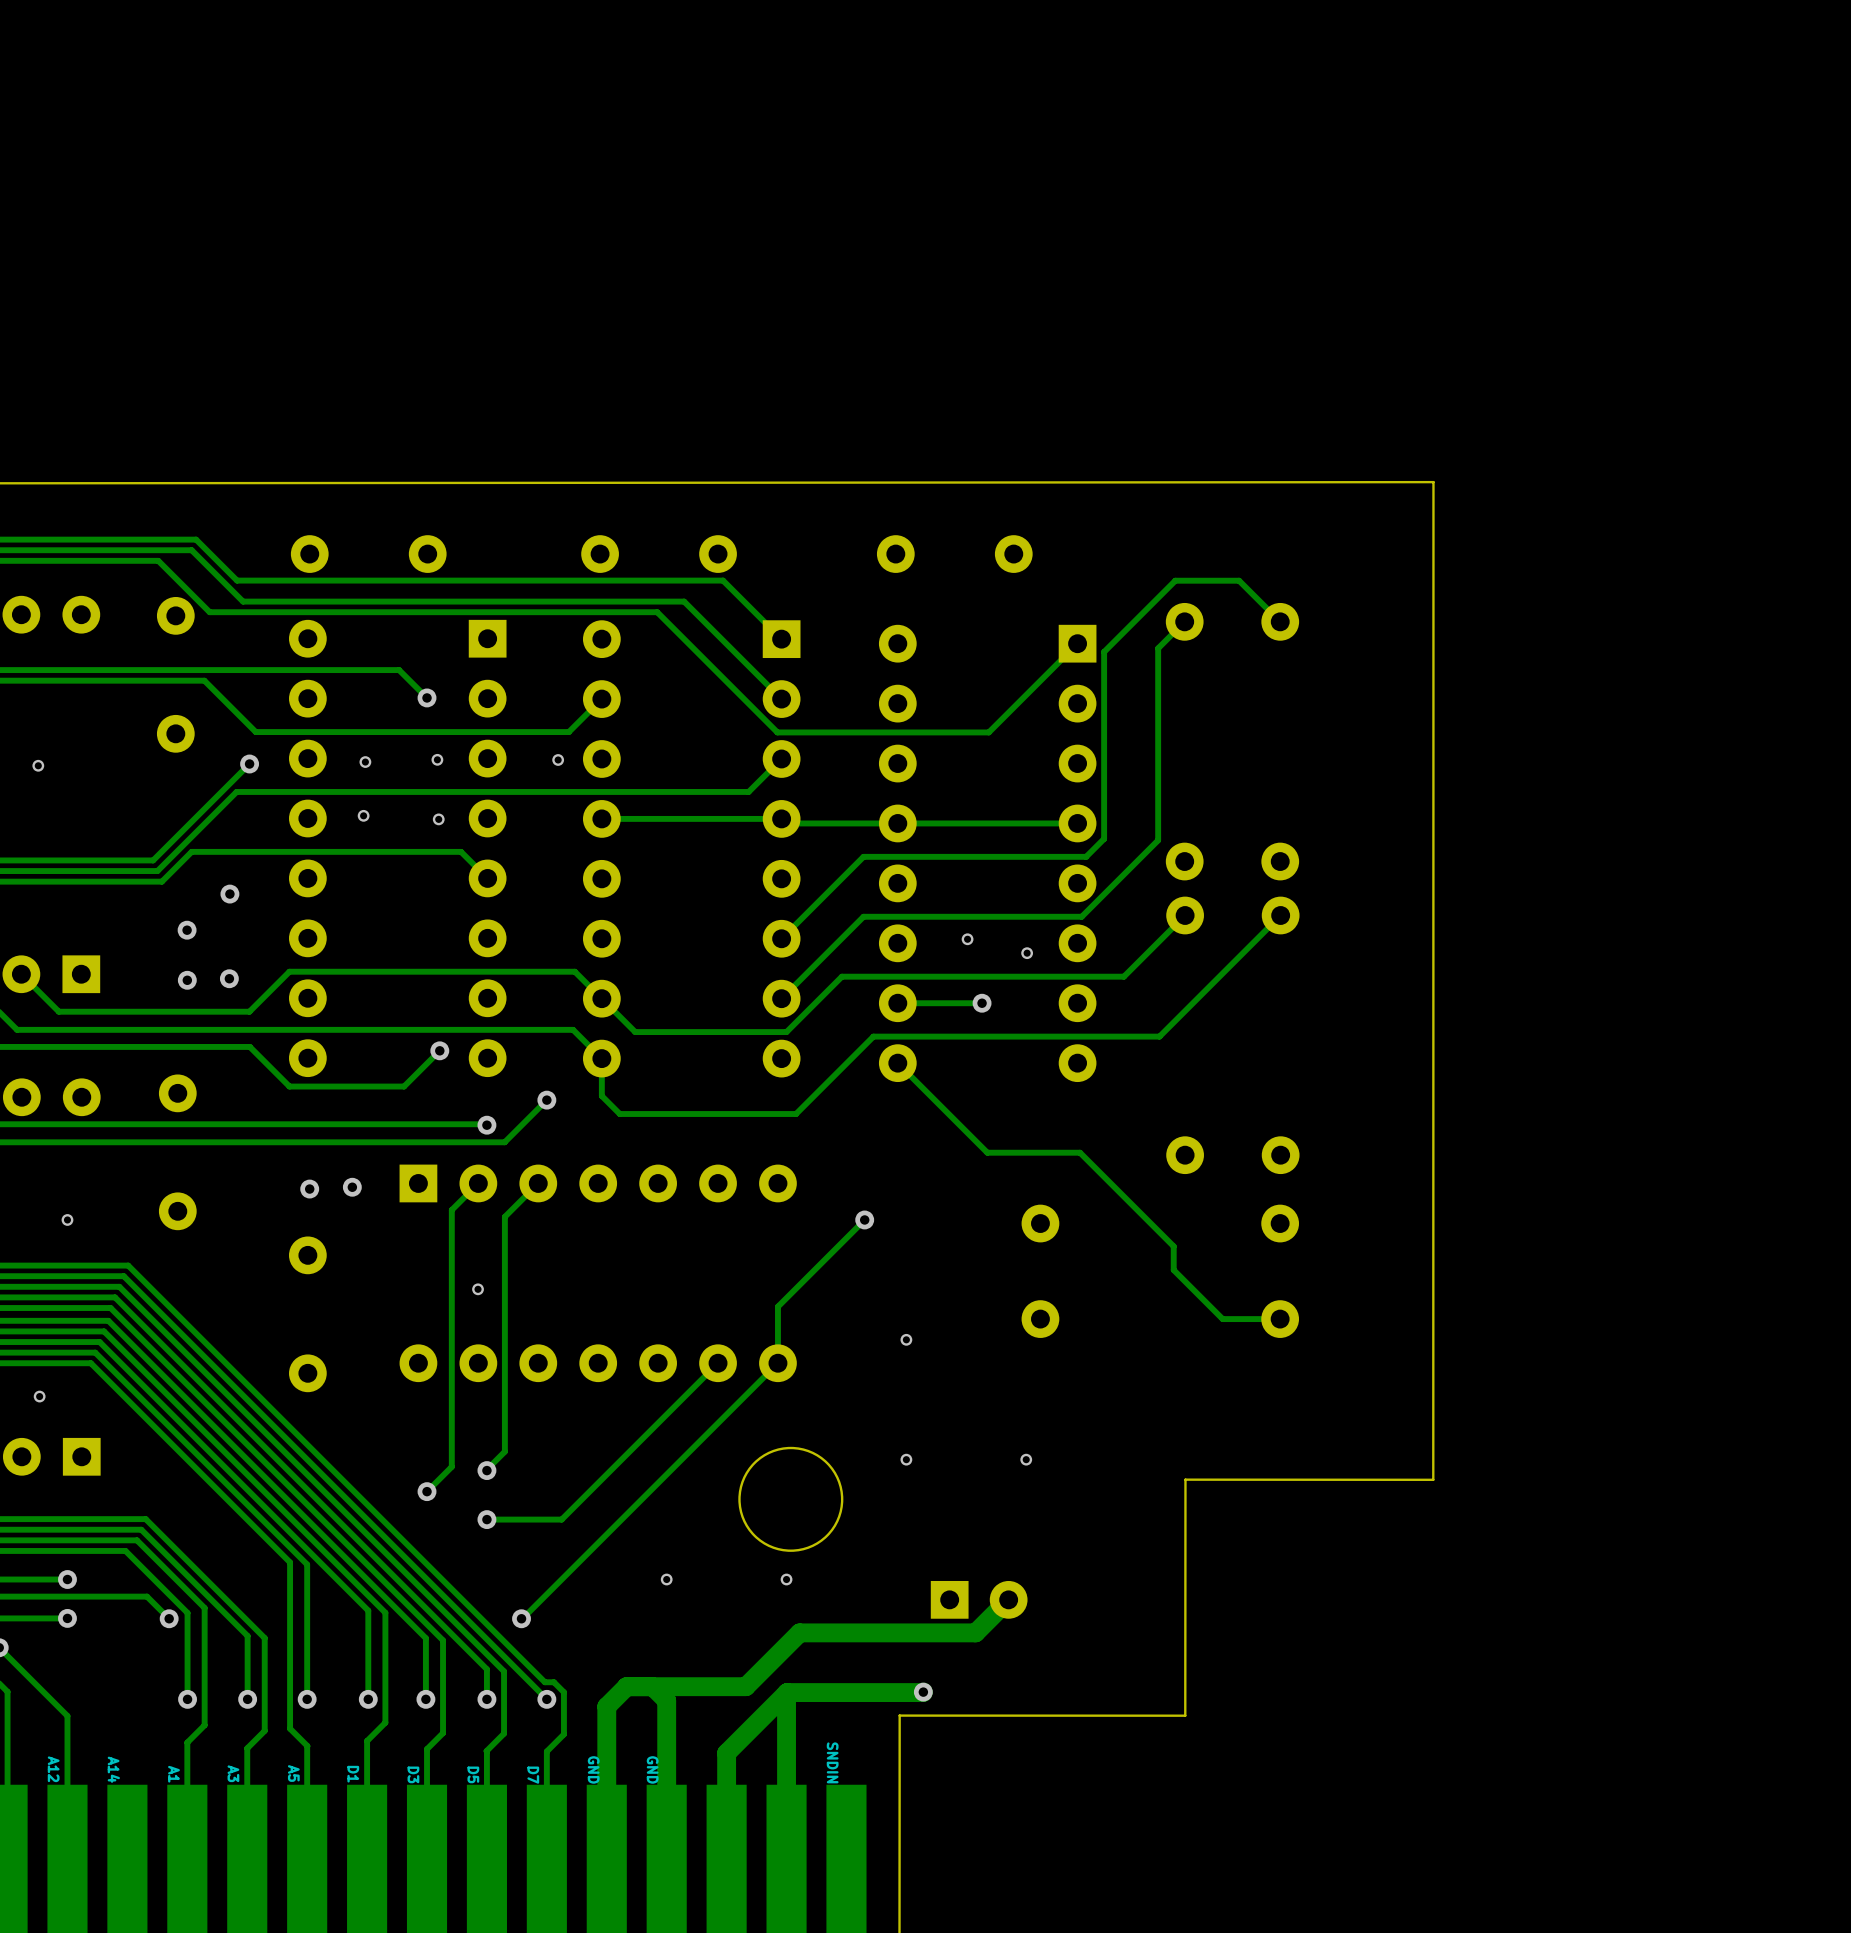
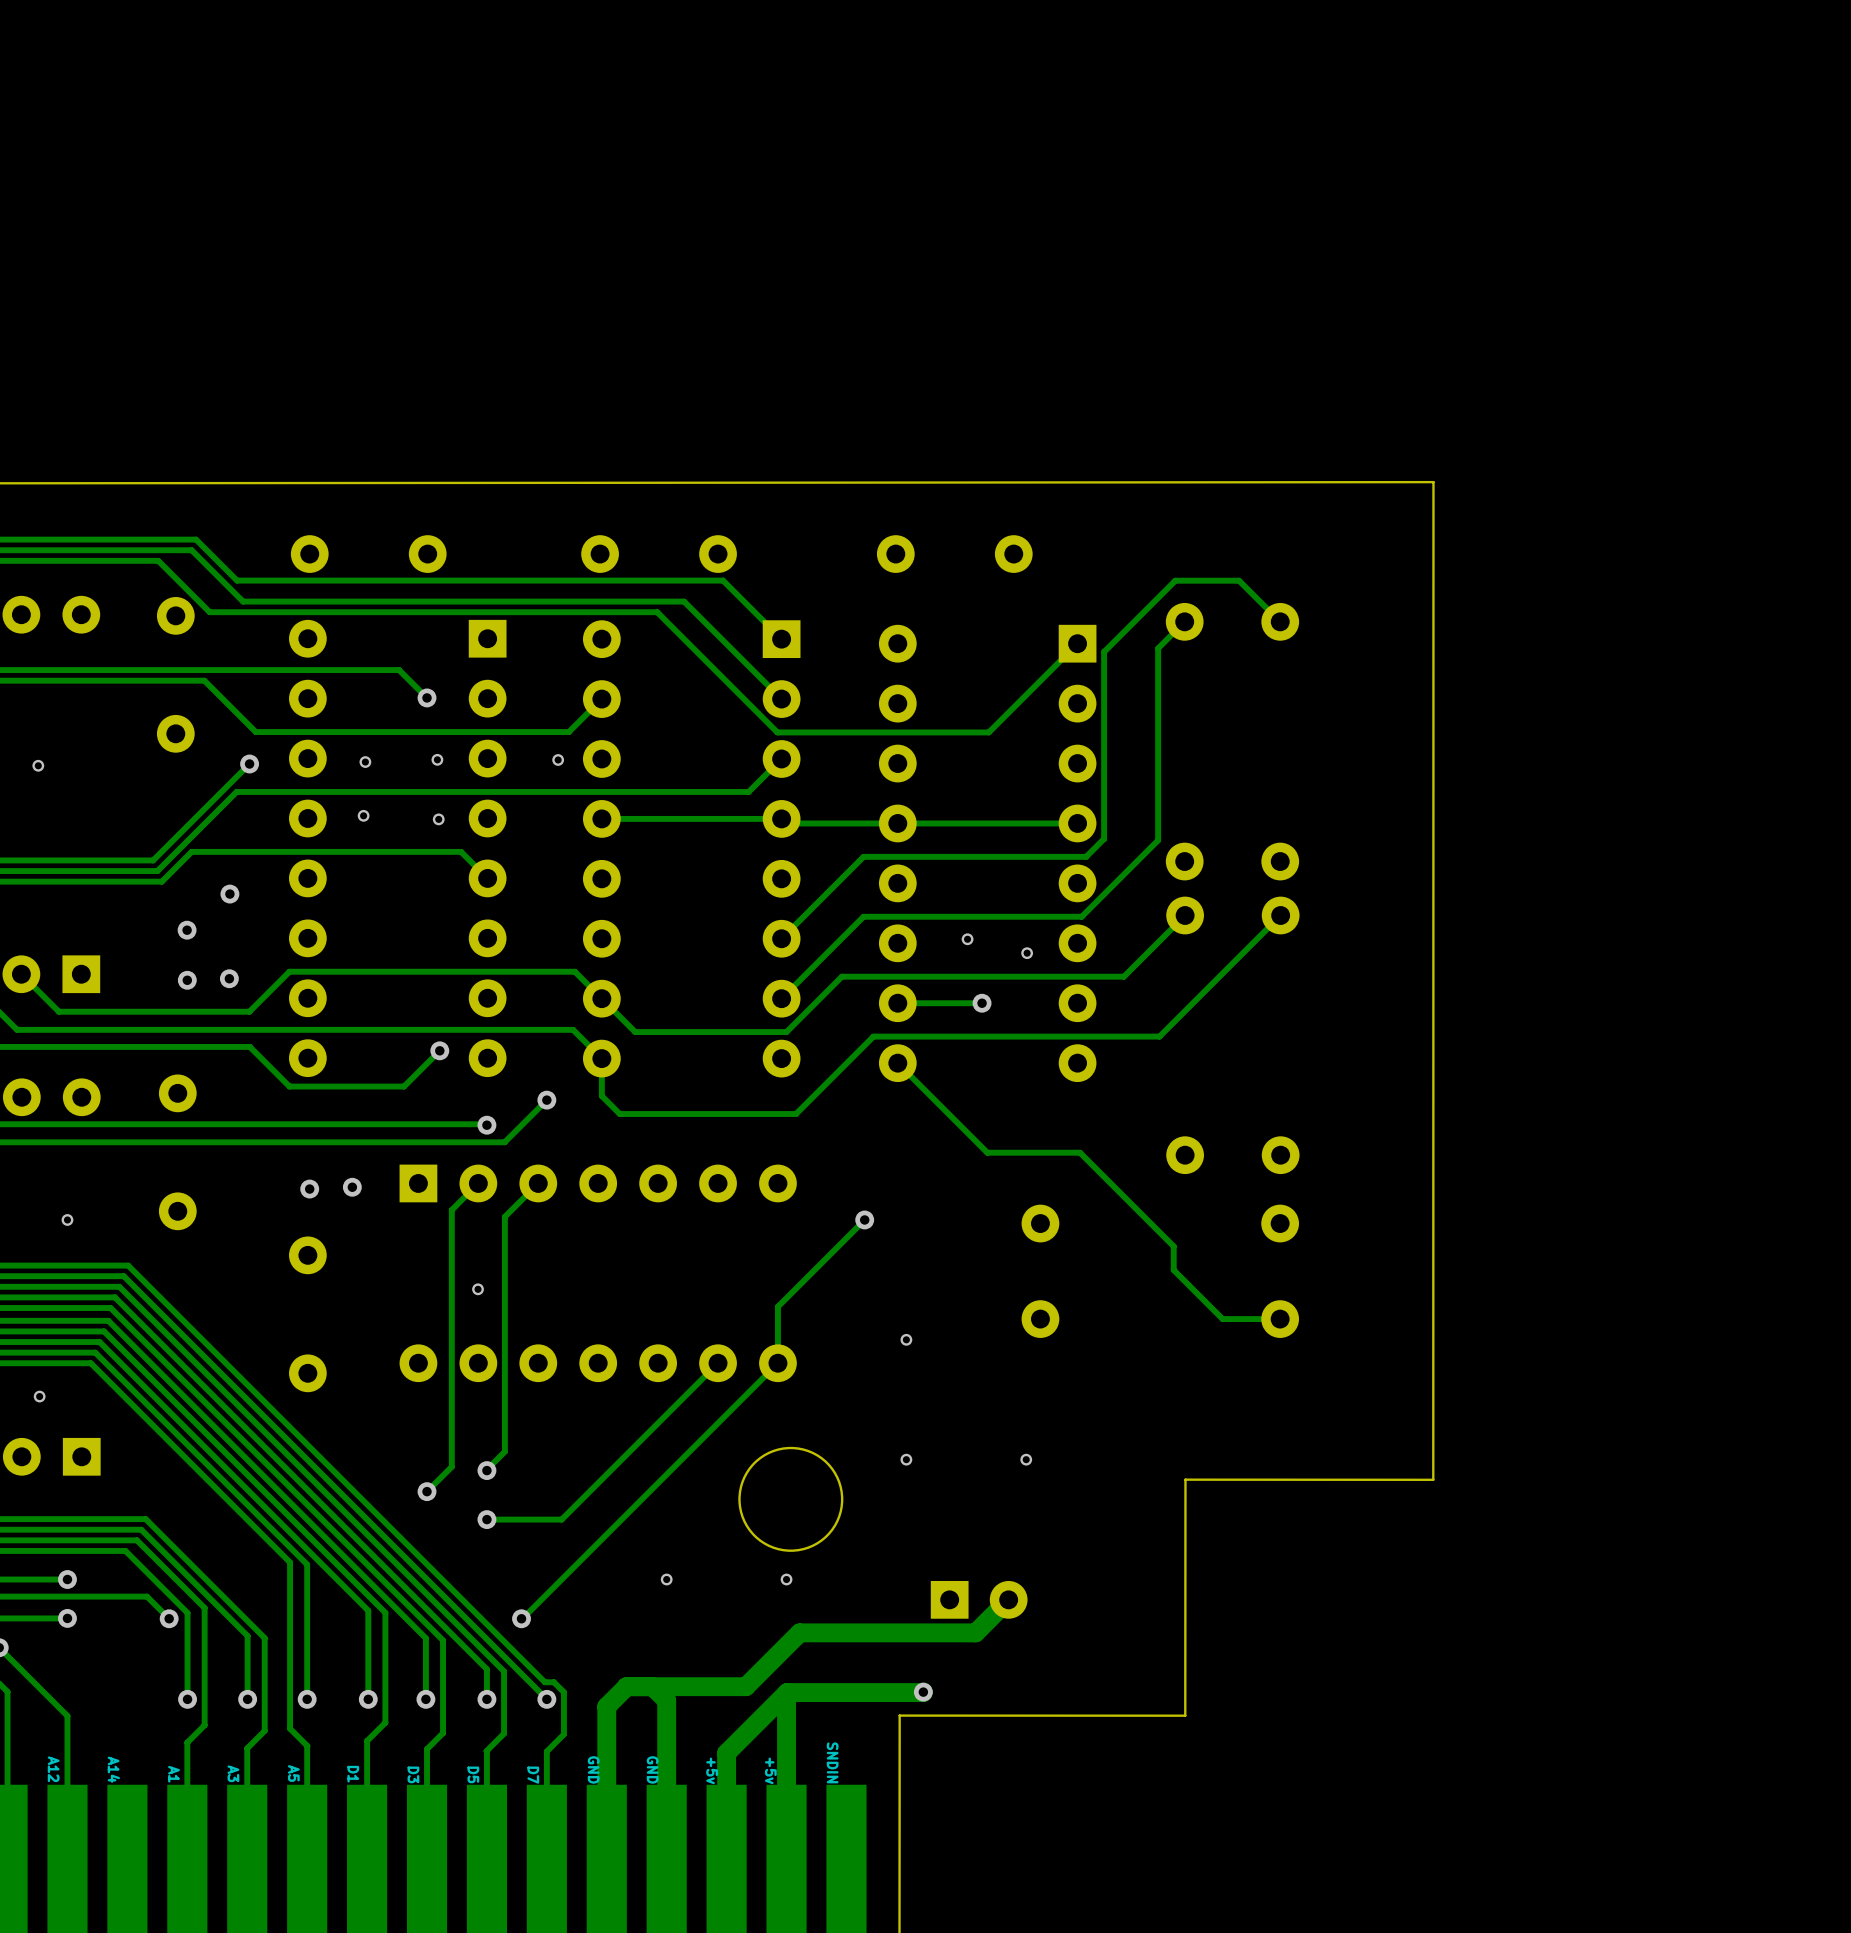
part text: none -> +5v (712, 1770)
part text: none -> +5v (770, 1770)

